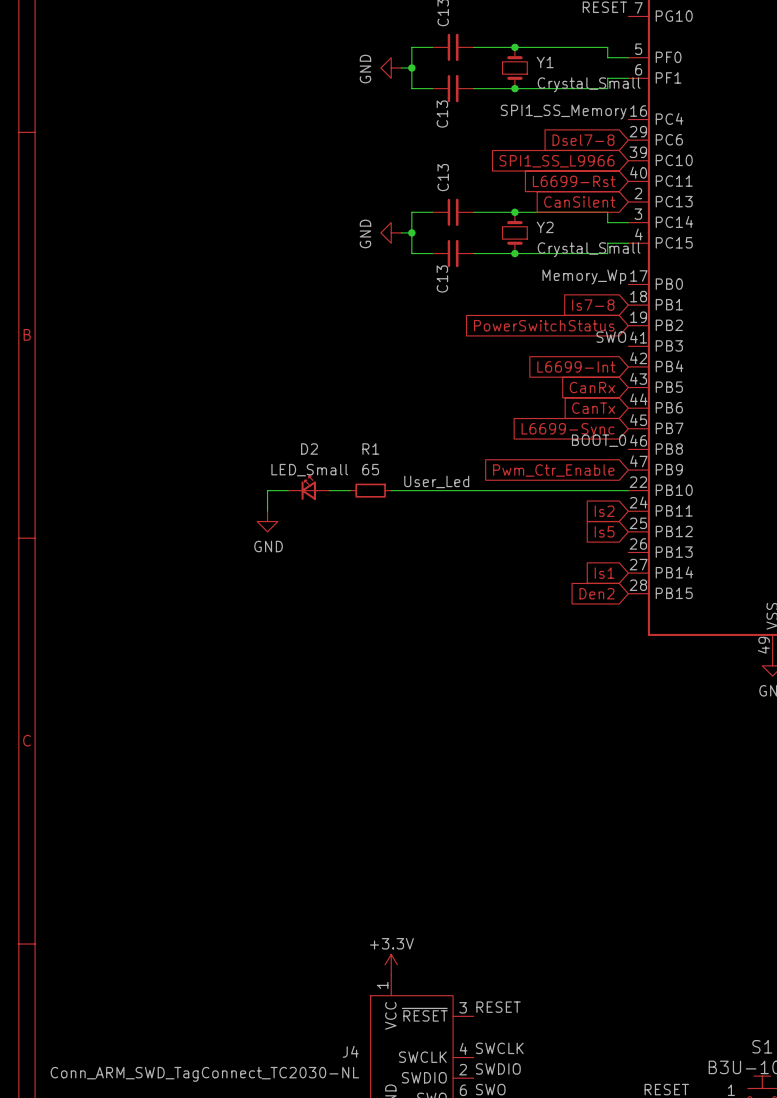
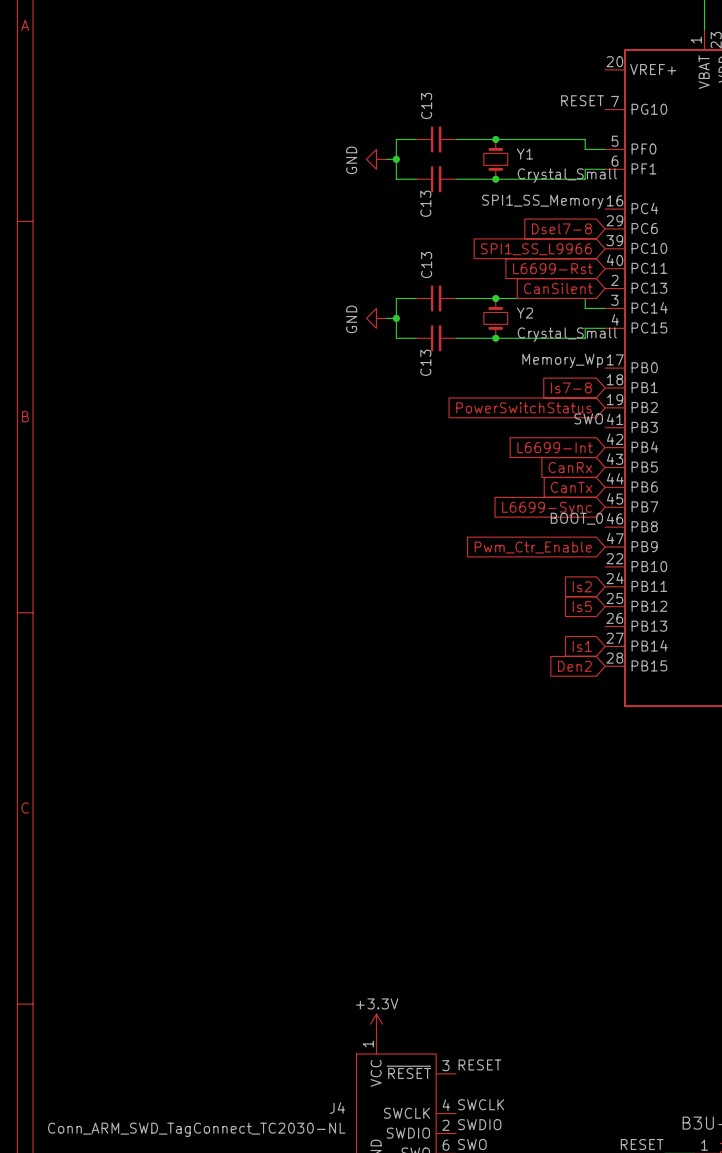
label: User_Led (436, 481) -> none
D2: LED_Small (308, 488) -> none
wire: (288, 490) (267, 490) (267, 511) -> none
wire: (329, 490) (349, 490) -> none
R1: 65 (370, 490) -> none
wire: (391, 490) (628, 490) -> none
power symbol: GND (267, 521) -> none

